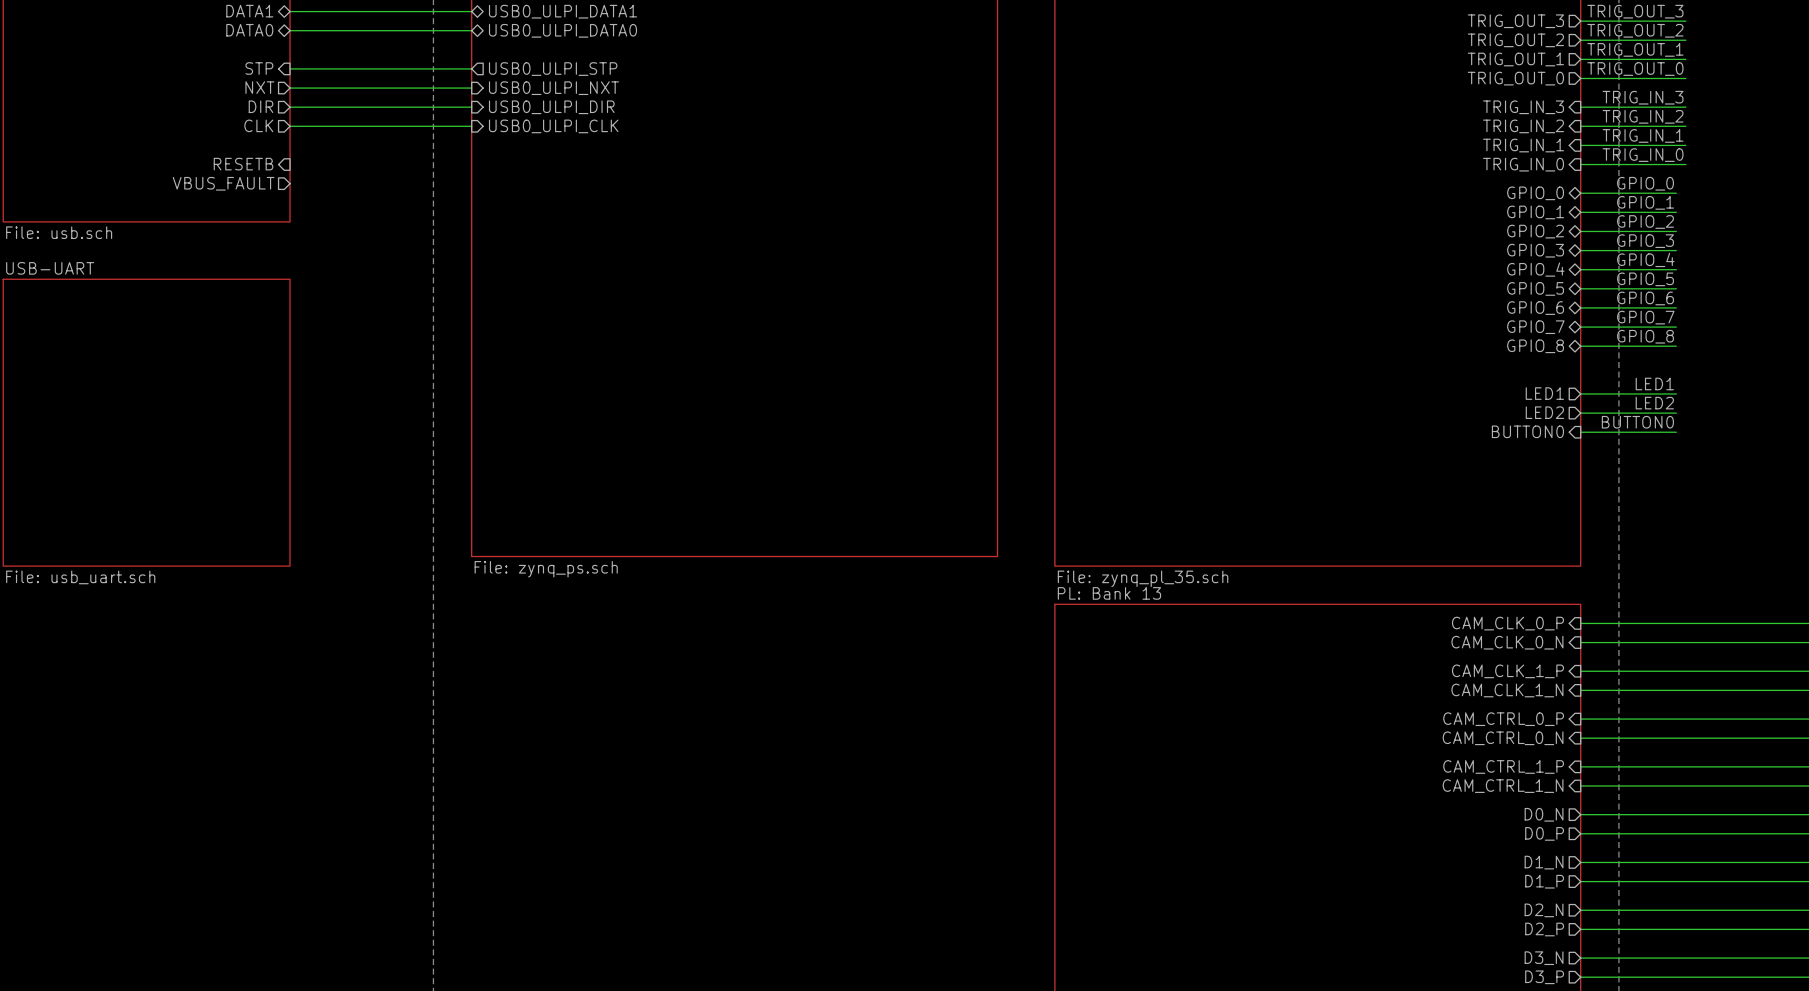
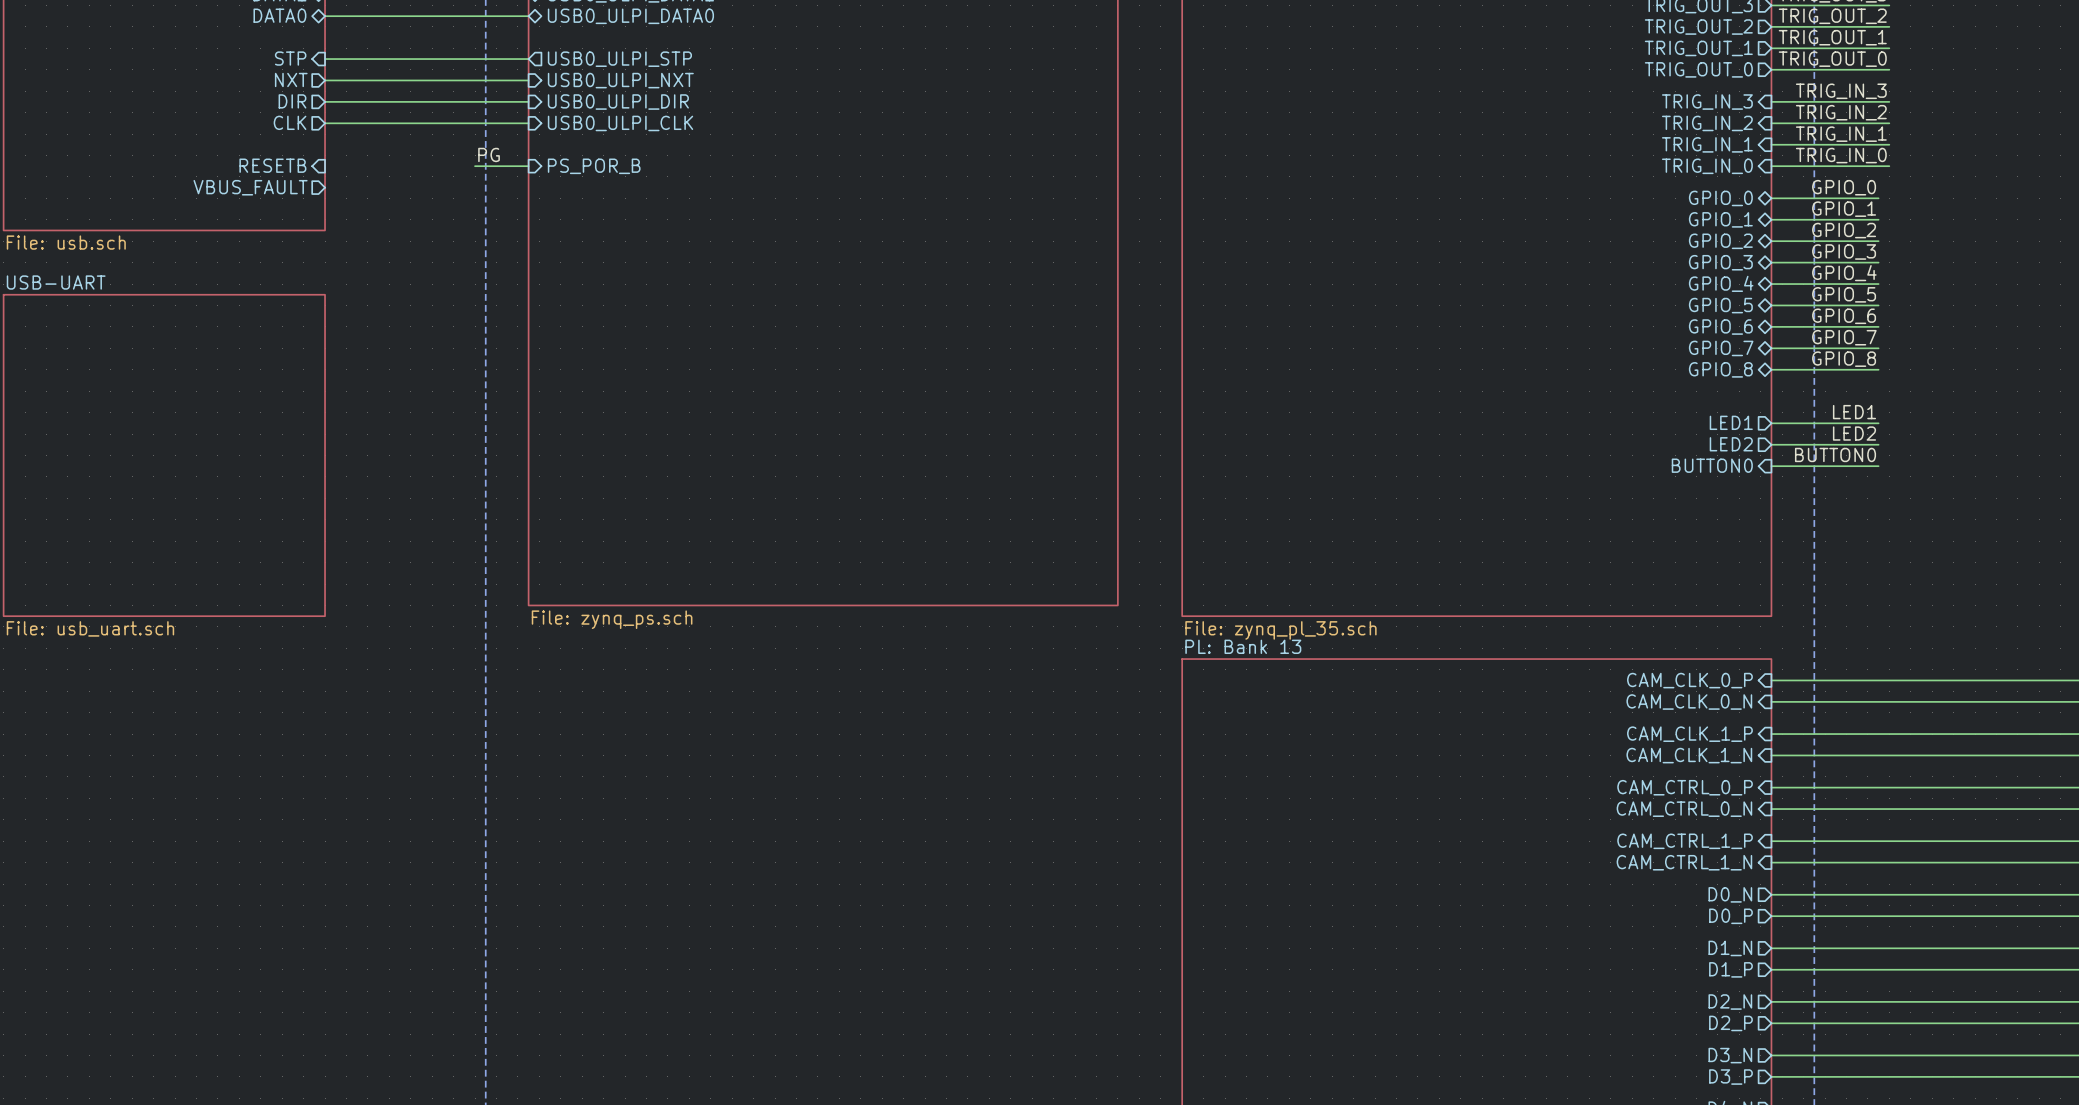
label: none -> PG (489, 154)
wire: none -> (475, 166) (528, 166)
sheet pin: none -> PS_POR_B (594, 166)

